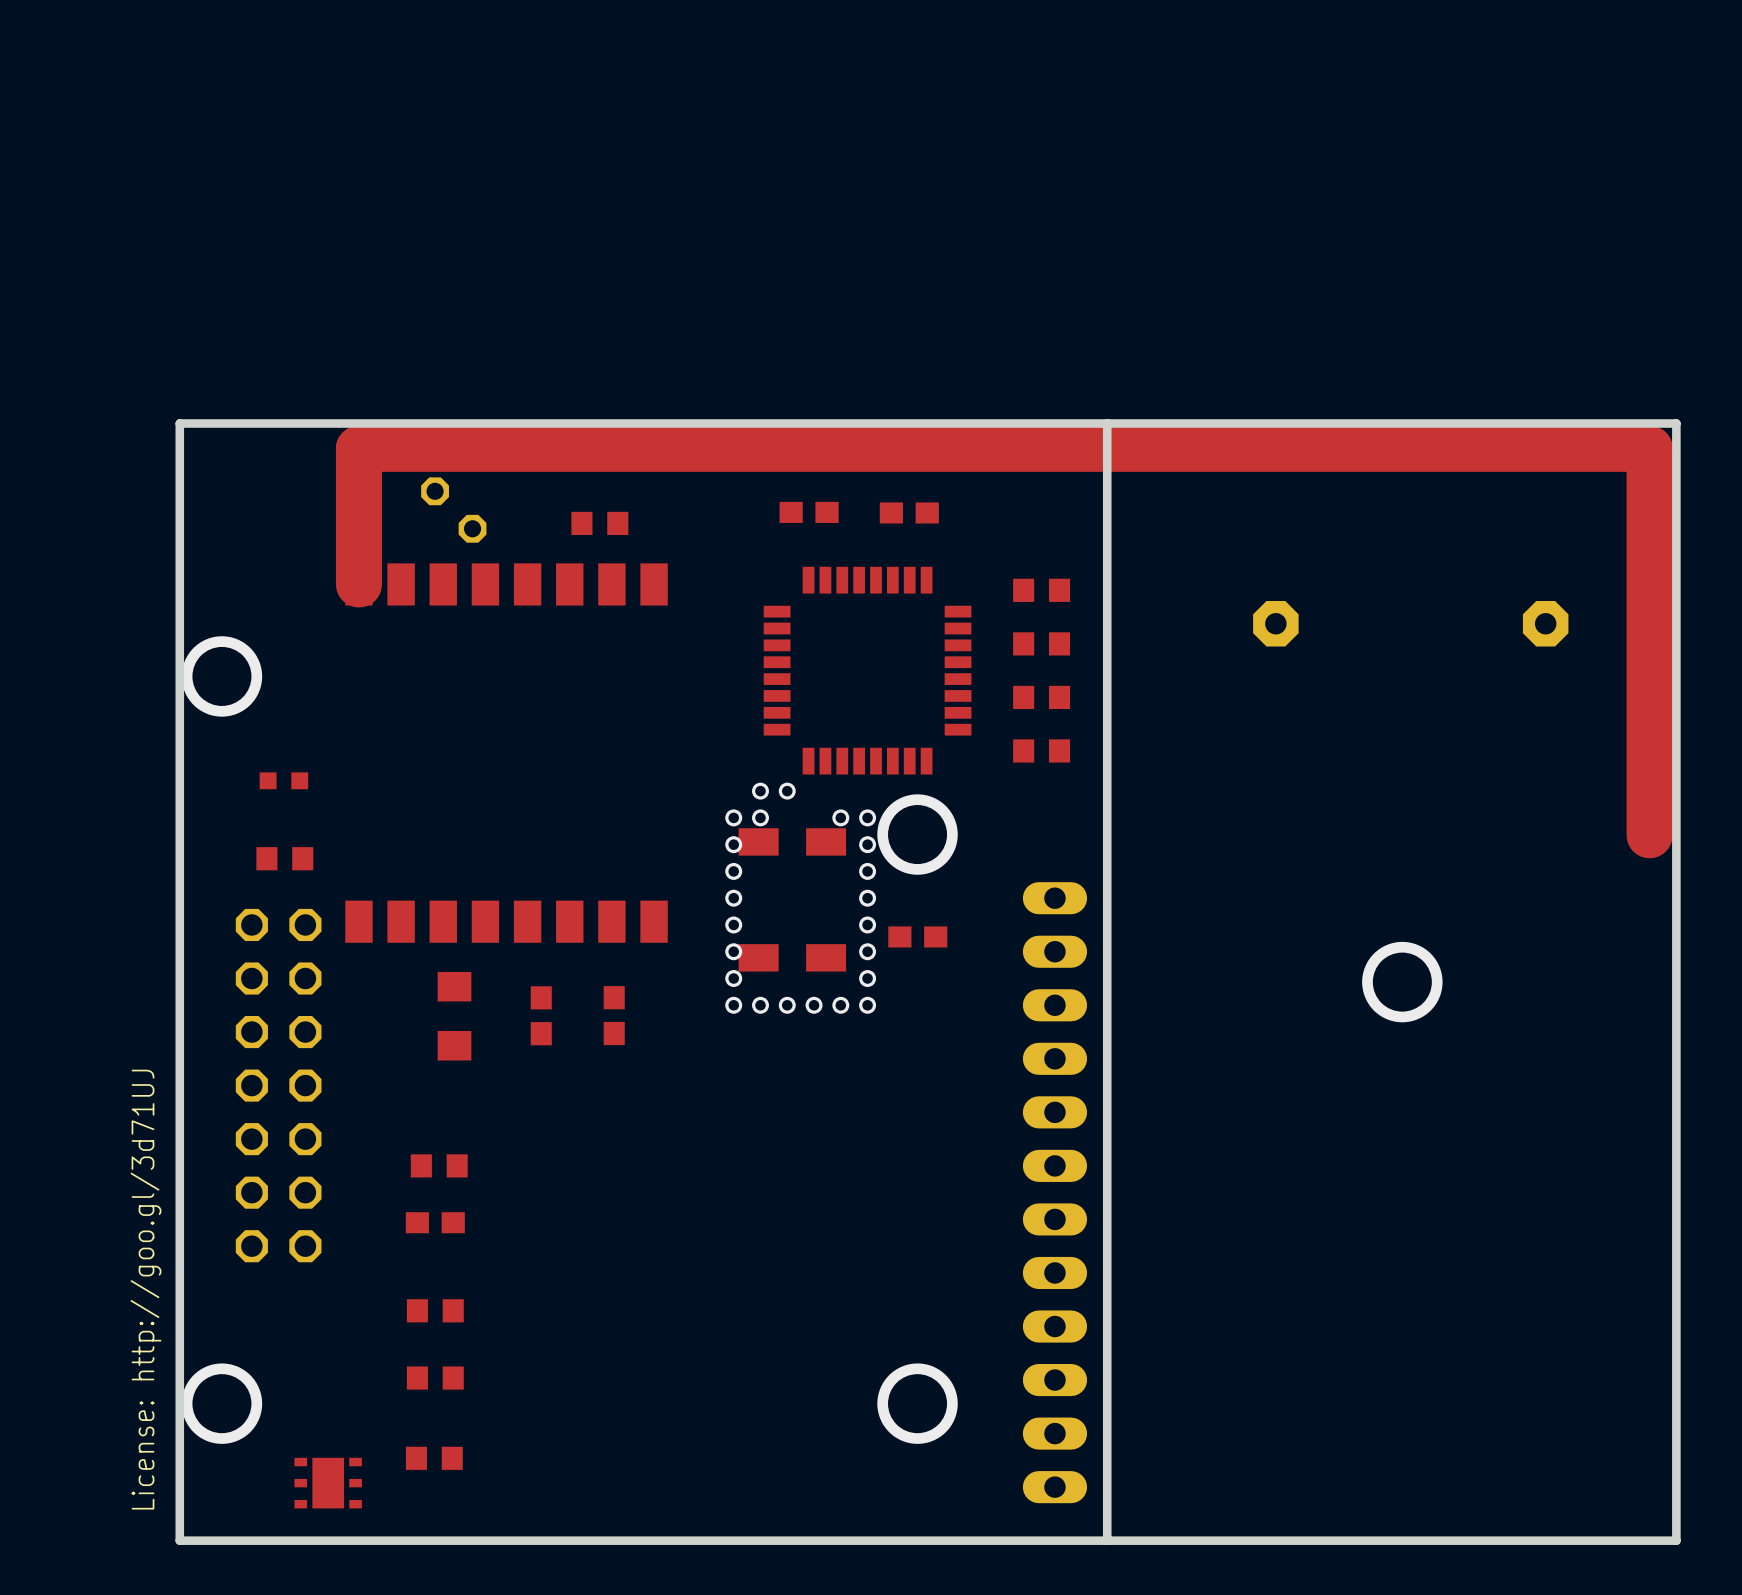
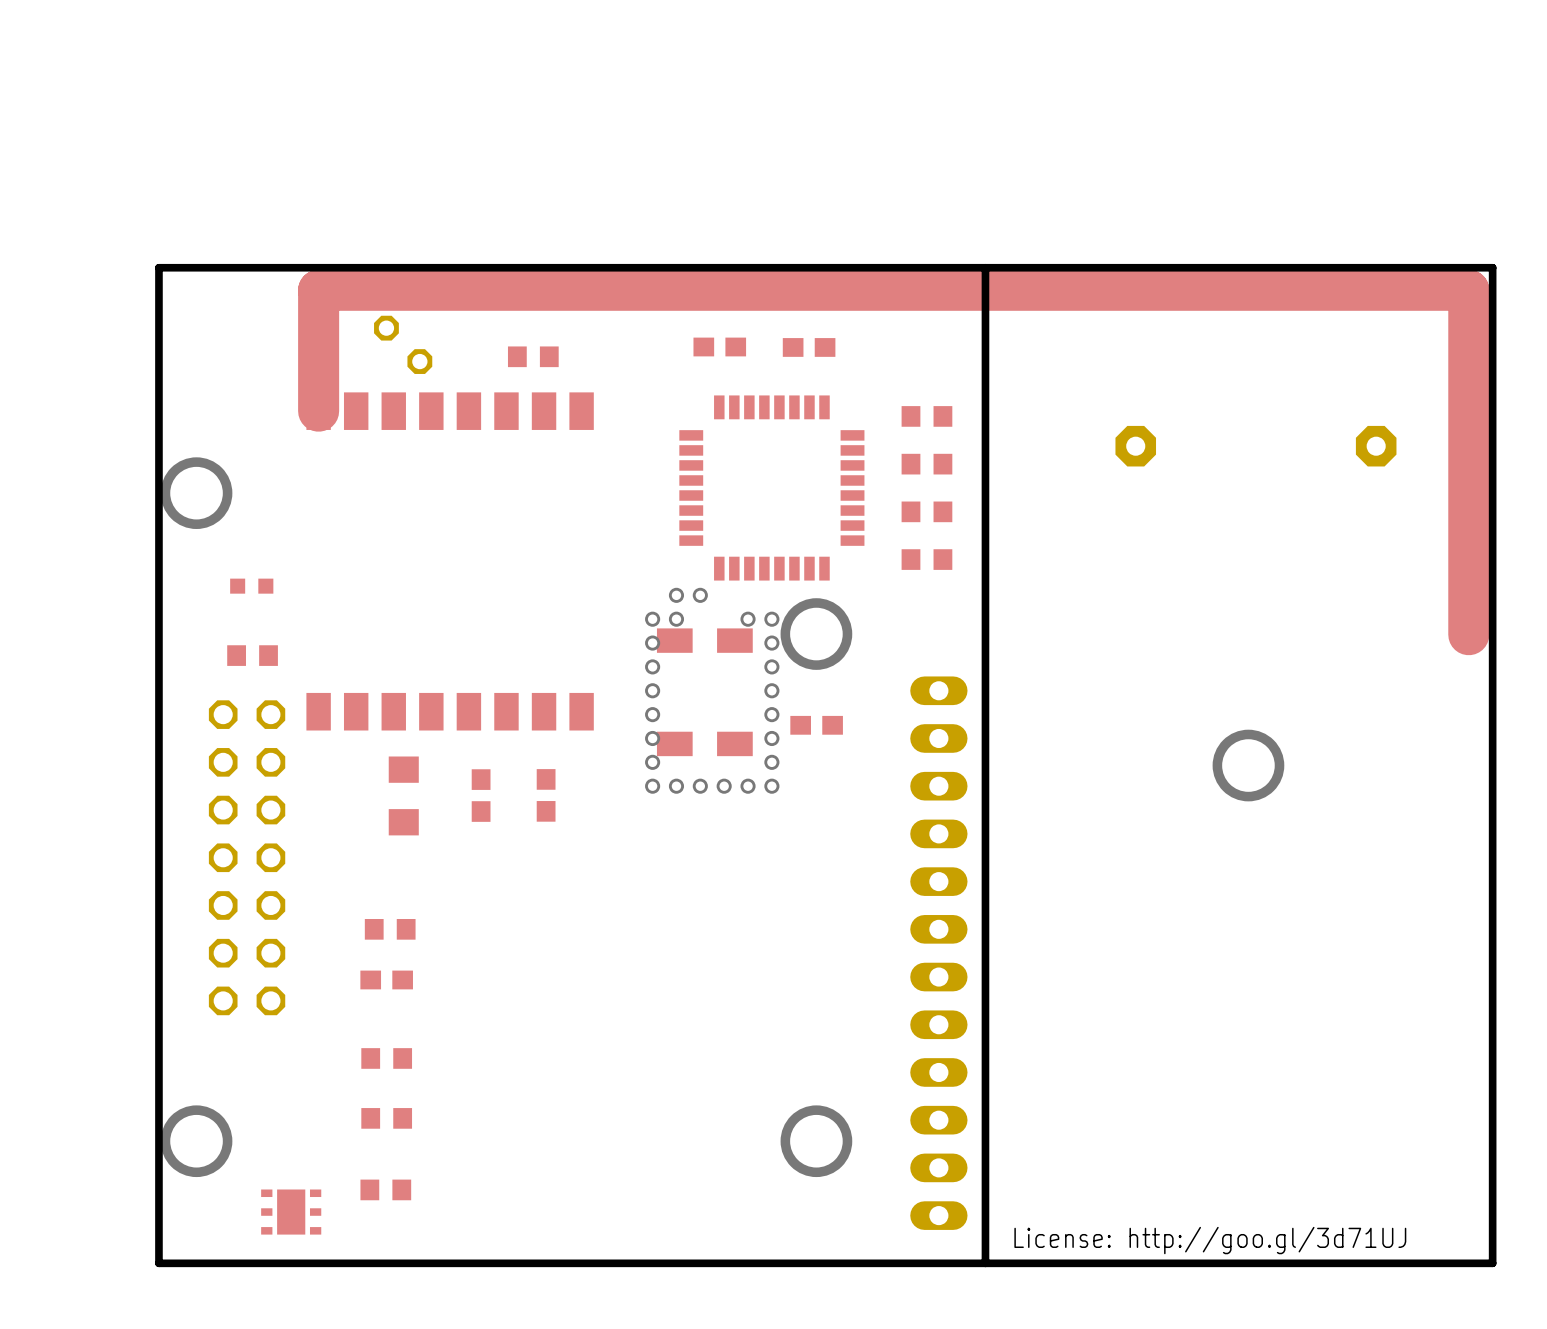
text: License: http://goo.gl/3d71UJ (146, 1289) -> none
text: none -> License: http://goo.gl/3d71UJ (1210, 1240)

